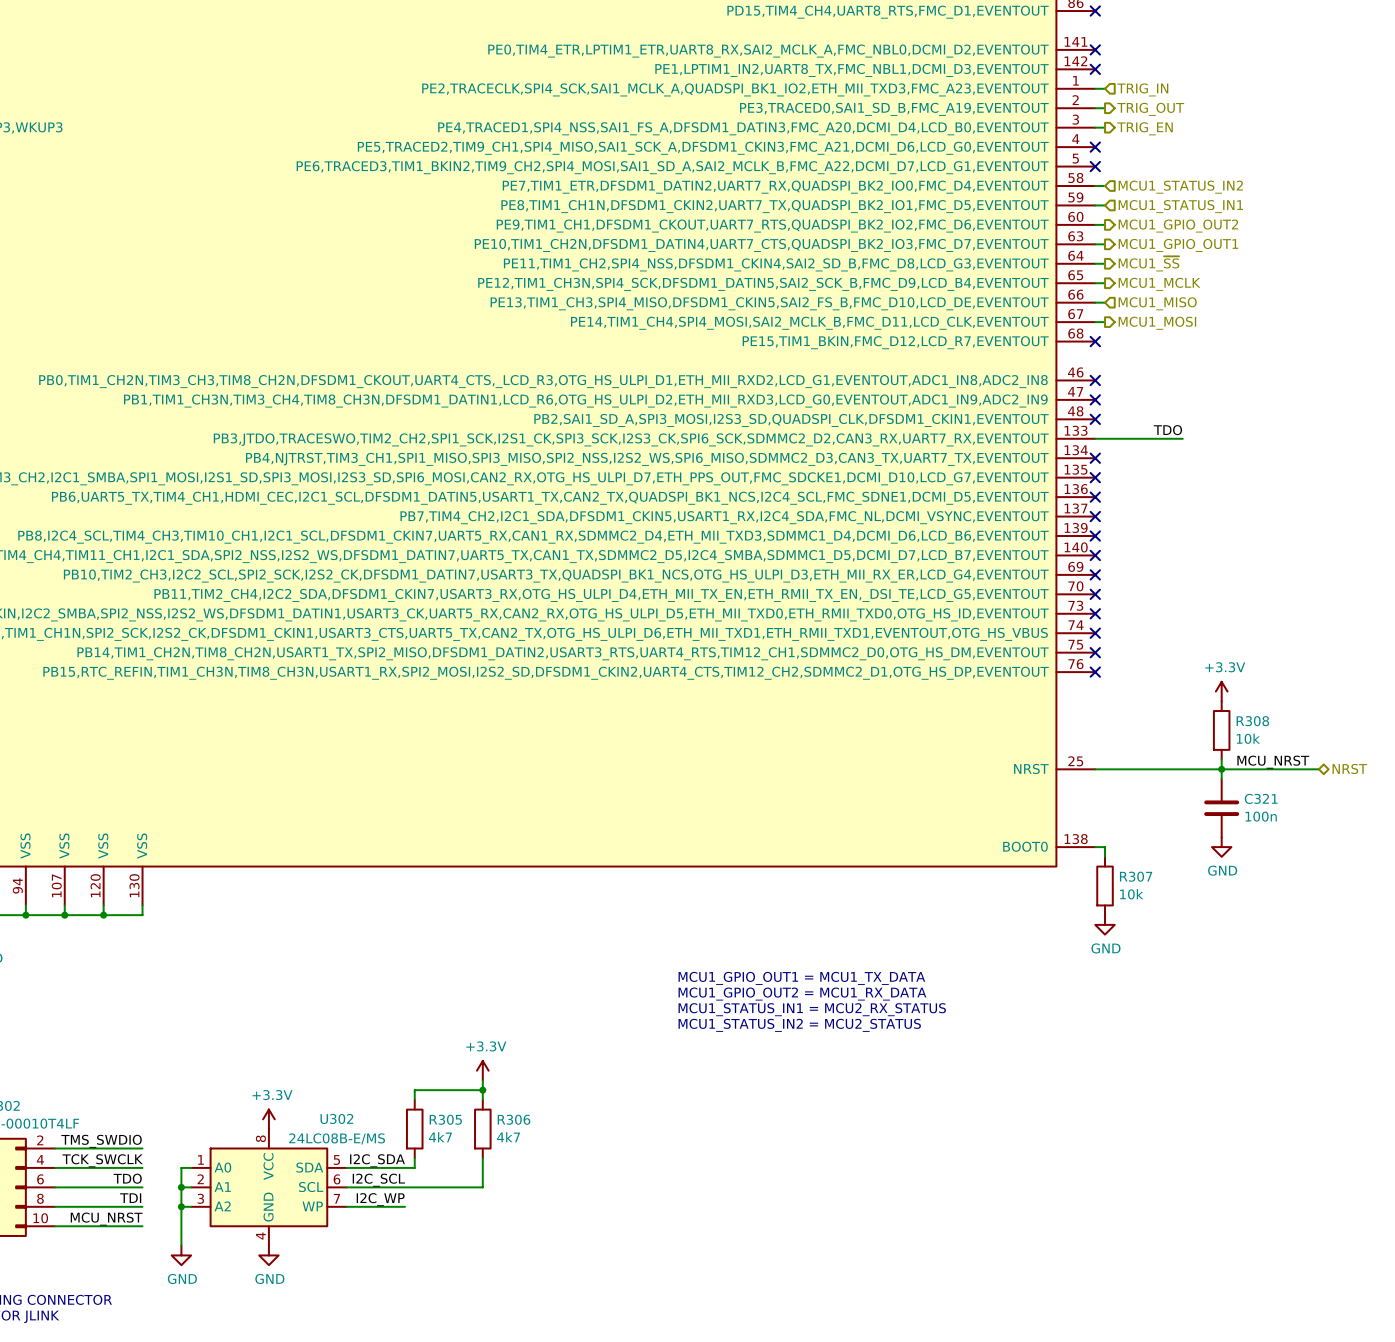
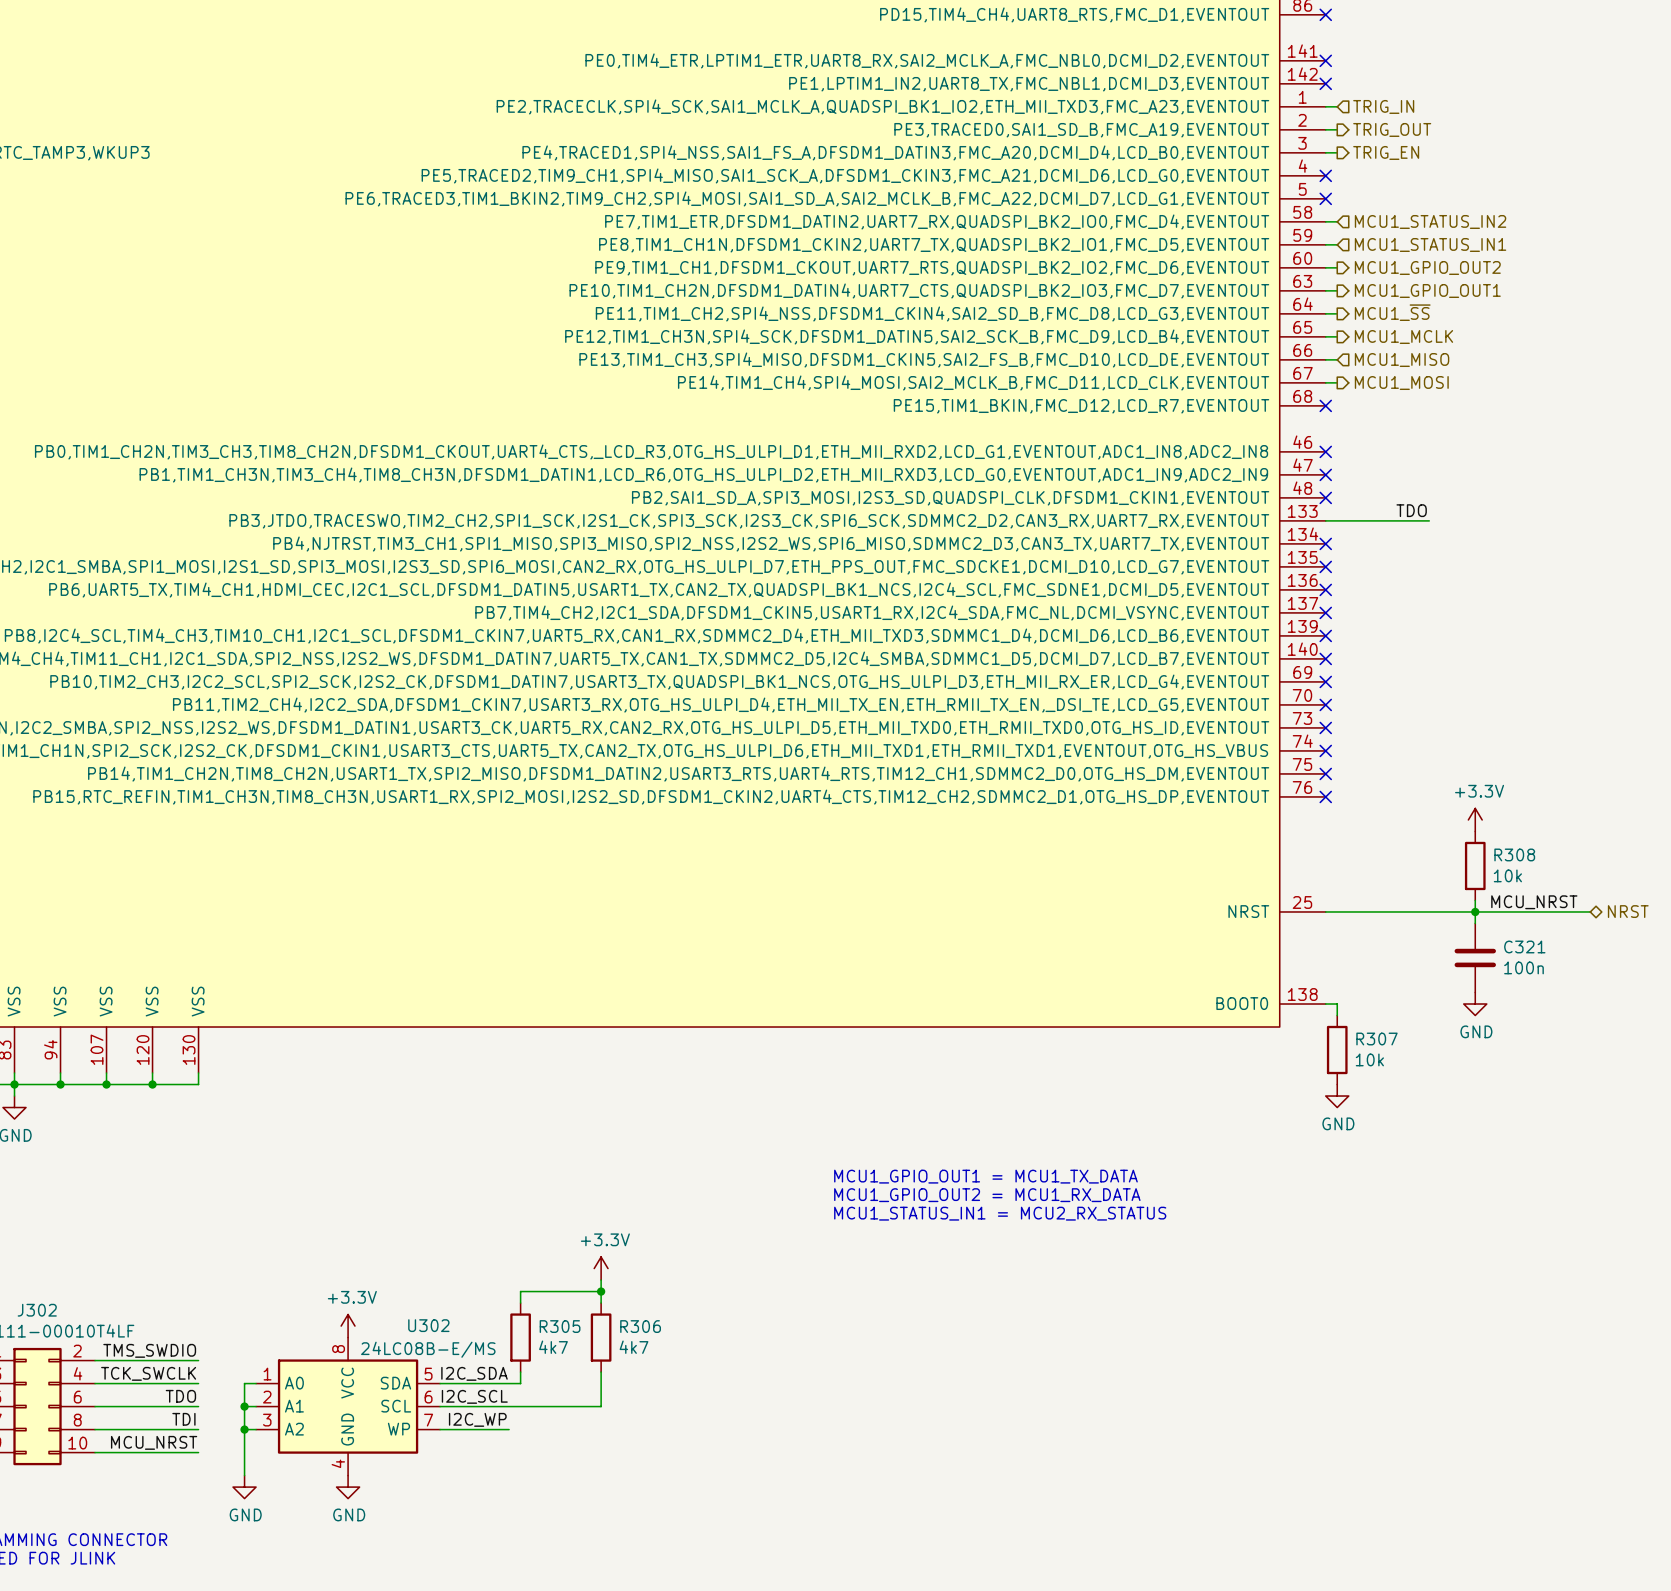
text: MCU1_GPIO_OUT1 = MCU1_TX_DATA (801, 978) -> none
text: MCU1_GPIO_OUT2 = MCU1_RX_DATA (802, 994) -> MCU1_GPIO_OUT1 = MCU1_TX_DATA (985, 1176)
text: MCU1_STATUS_IN1 = MCU2_RX_STATUS (812, 1009) -> MCU1_GPIO_OUT2 = MCU1_RX_DATA (987, 1195)
text: MCU1_STATUS_IN2 = MCU2_STATUS (799, 1025) -> MCU1_STATUS_IN1 = MCU2_RX_STATUS (1000, 1213)

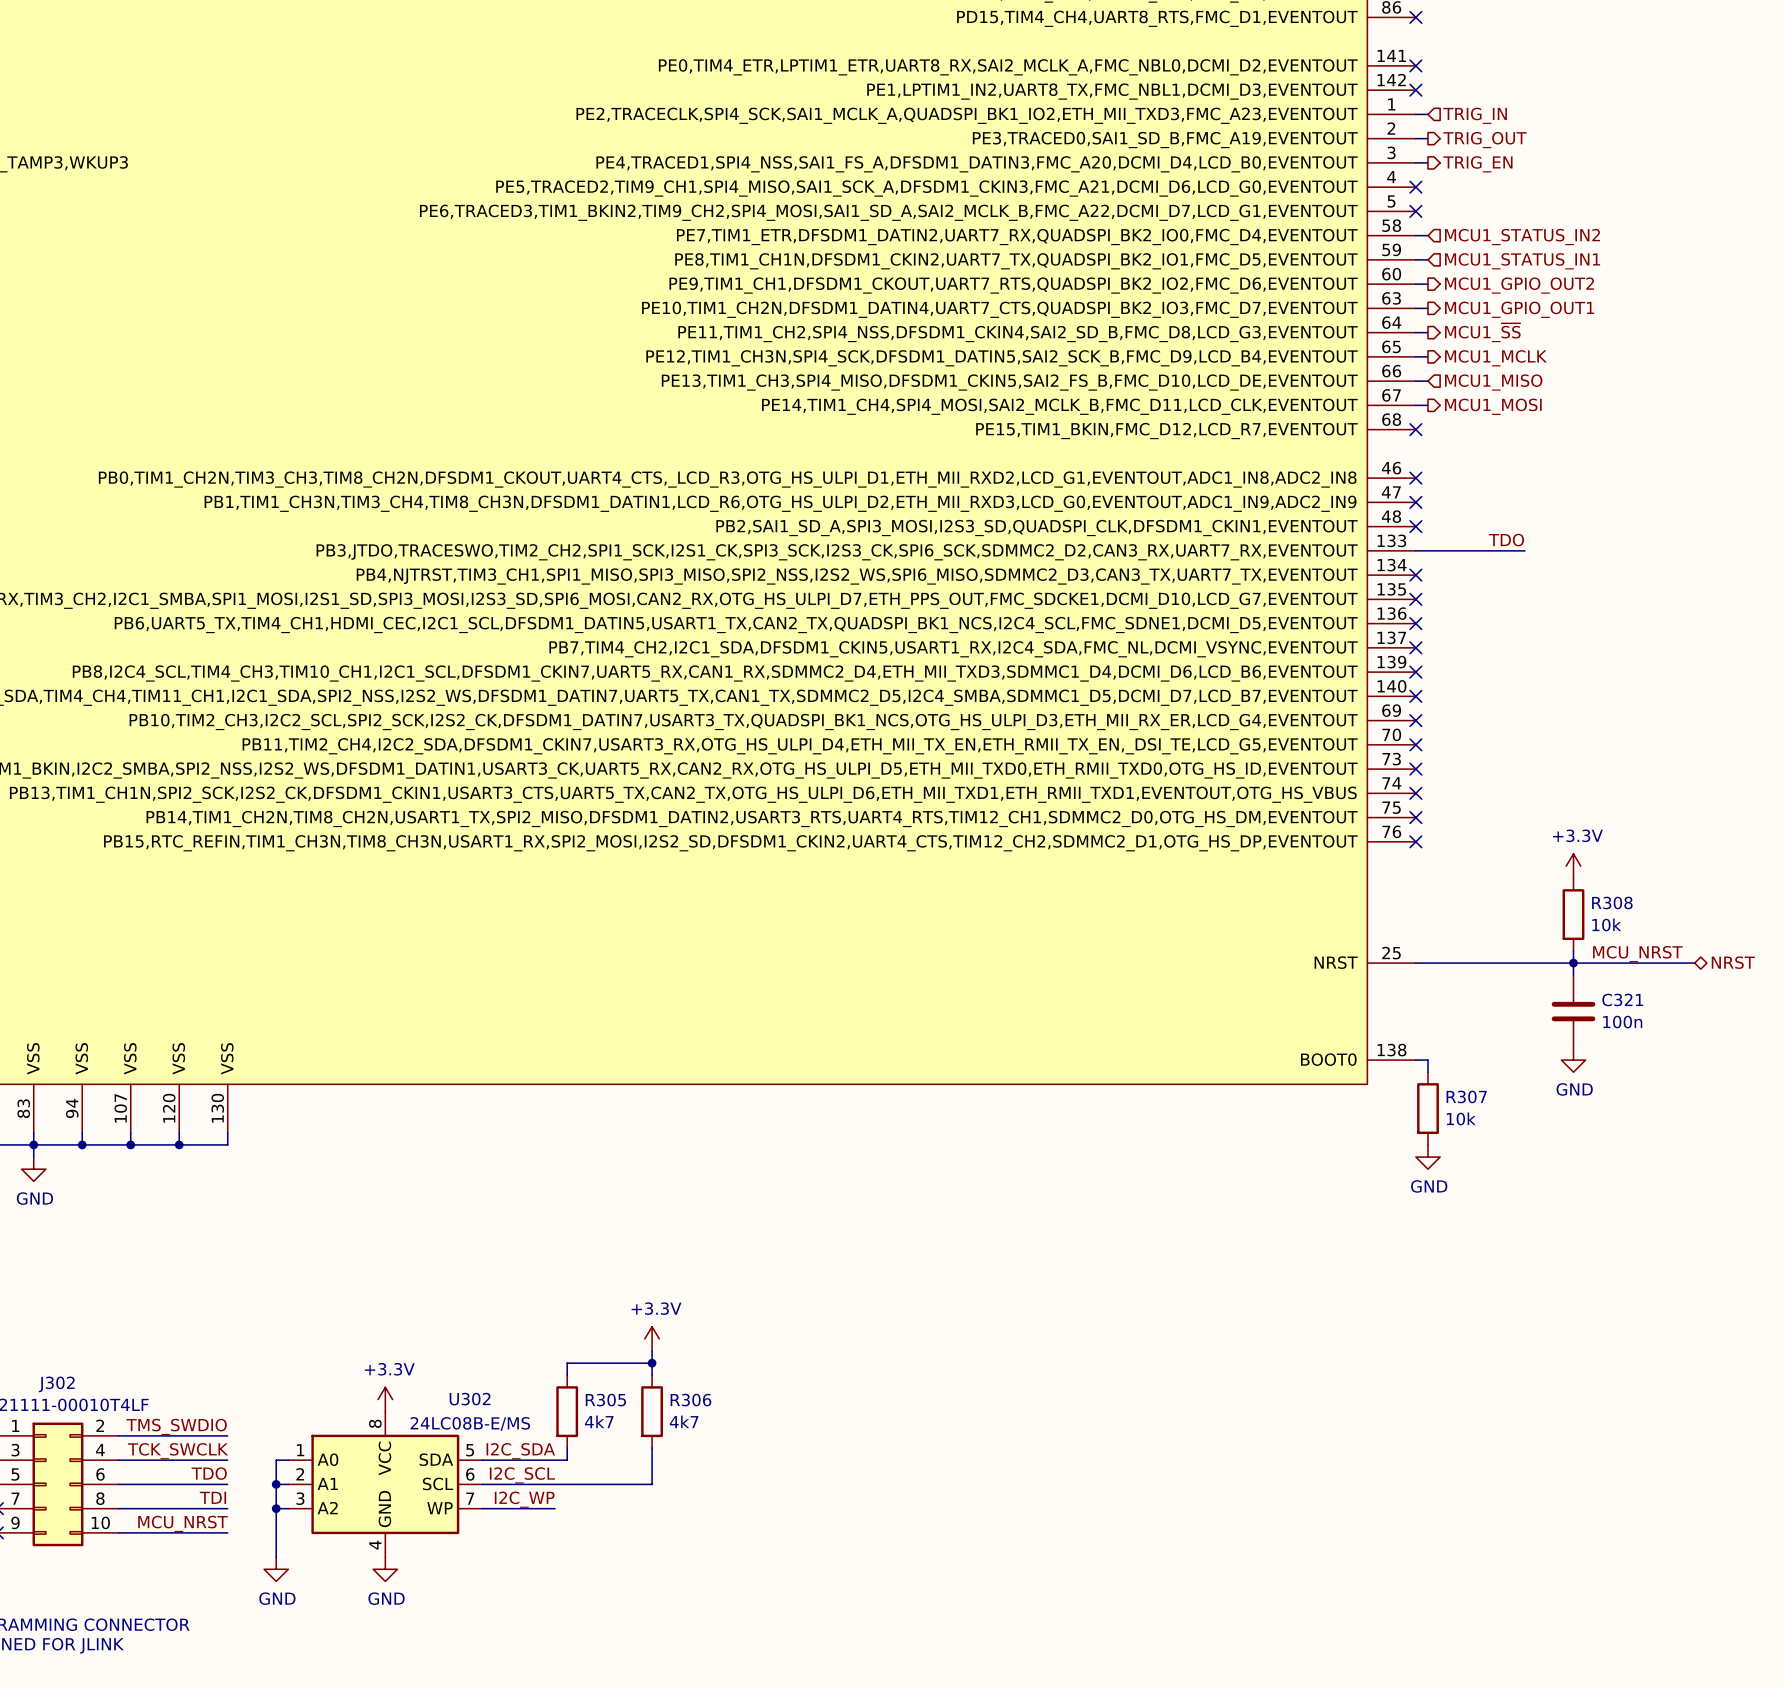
text: MCU1_GPIO_OUT1 = MCU1_TX_DATA (985, 1176) -> none
text: MCU1_GPIO_OUT2 = MCU1_RX_DATA (987, 1195) -> none
text: MCU1_STATUS_IN1 = MCU2_RX_STATUS (1000, 1213) -> none

